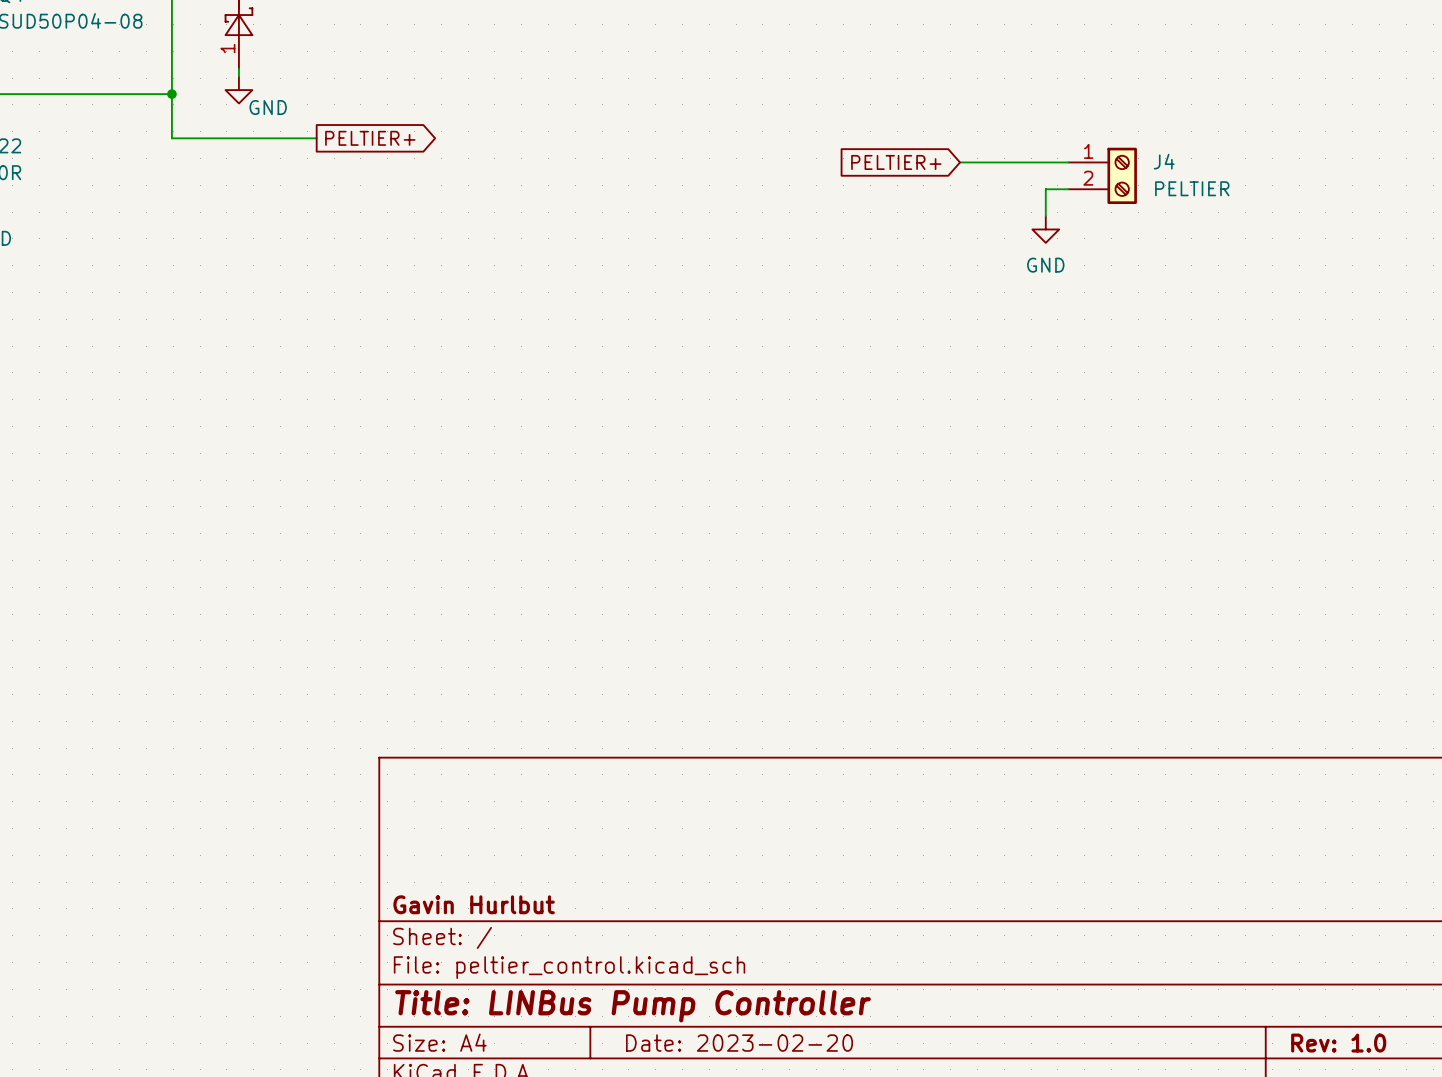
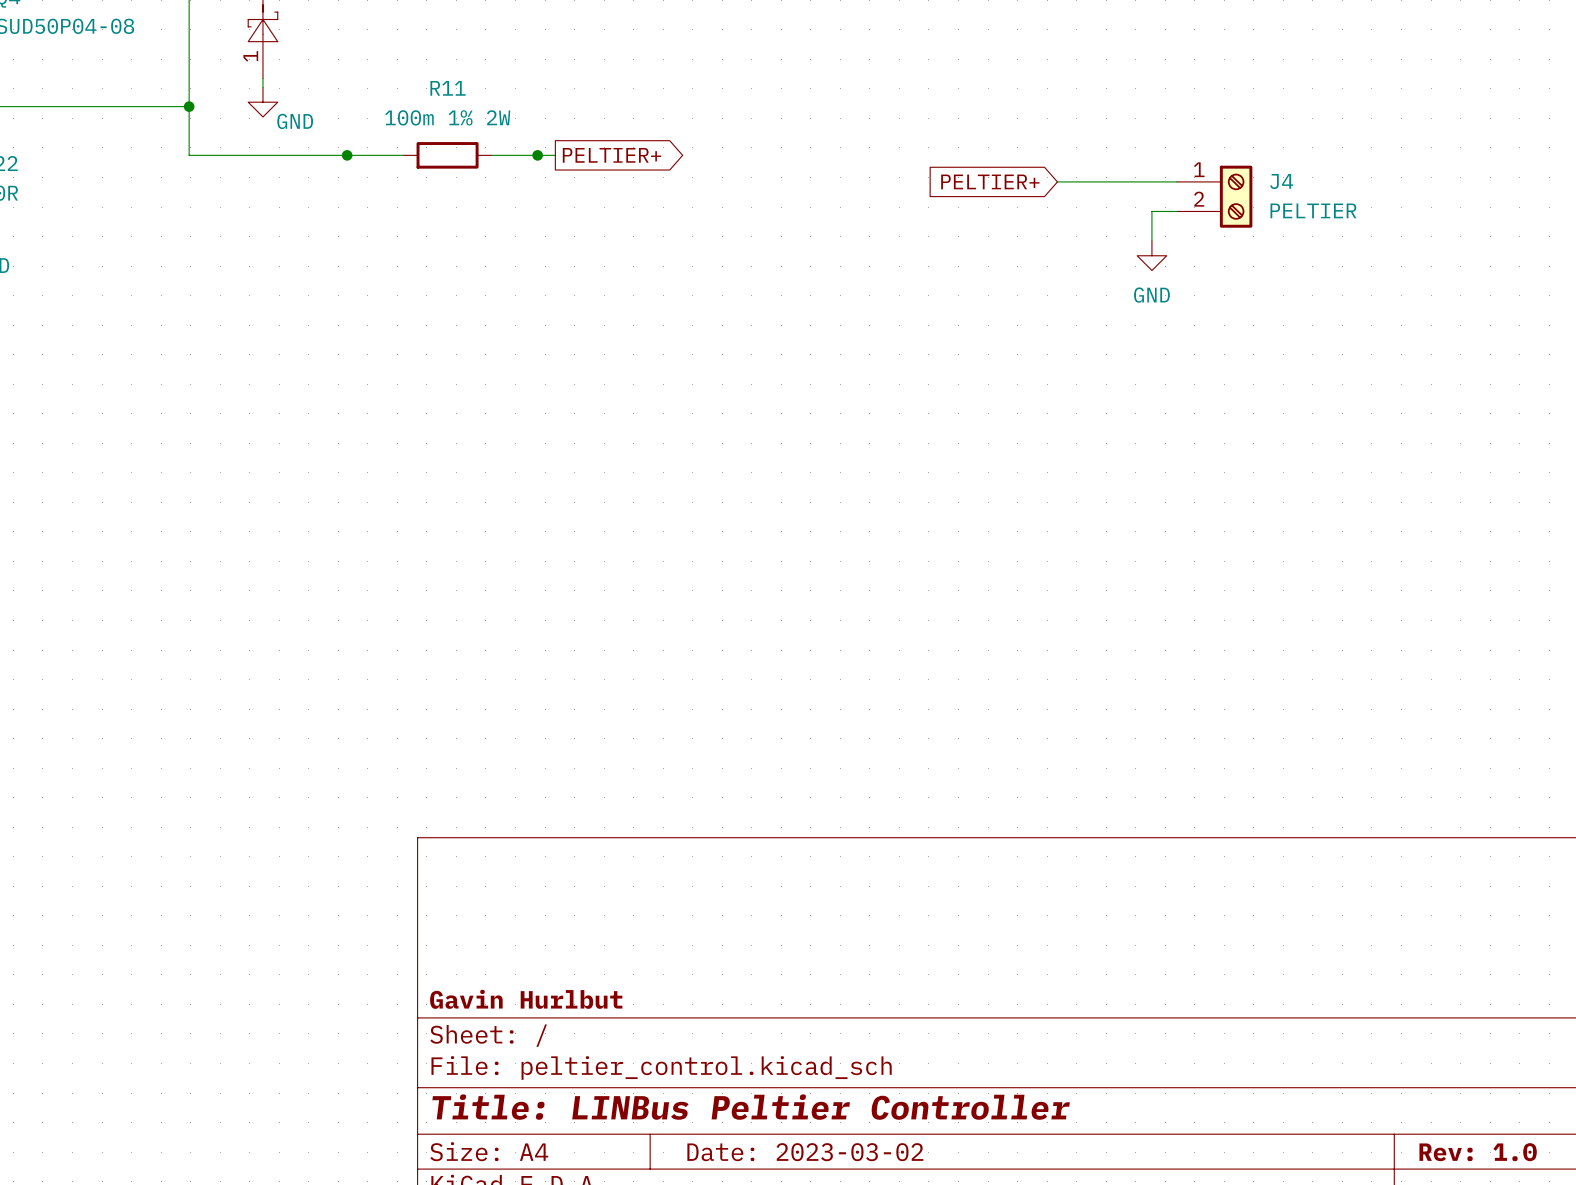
junction: none -> (347, 155)
wire: none -> (348, 155) (403, 155)
global label position: PELTIER+ (370, 138) -> PELTIER+ (611, 155)
R11: none -> 100m 1% 2W (447, 155)
wire: none -> (491, 155) (555, 155)
junction: none -> (537, 155)
title block: Title: LINBus Pump Controller (633, 1006) -> Title: LINBus Peltier Controller (751, 1107)
title block: Date: 2023-02-20 (739, 1043) -> Date: 2023-03-02 (805, 1152)

